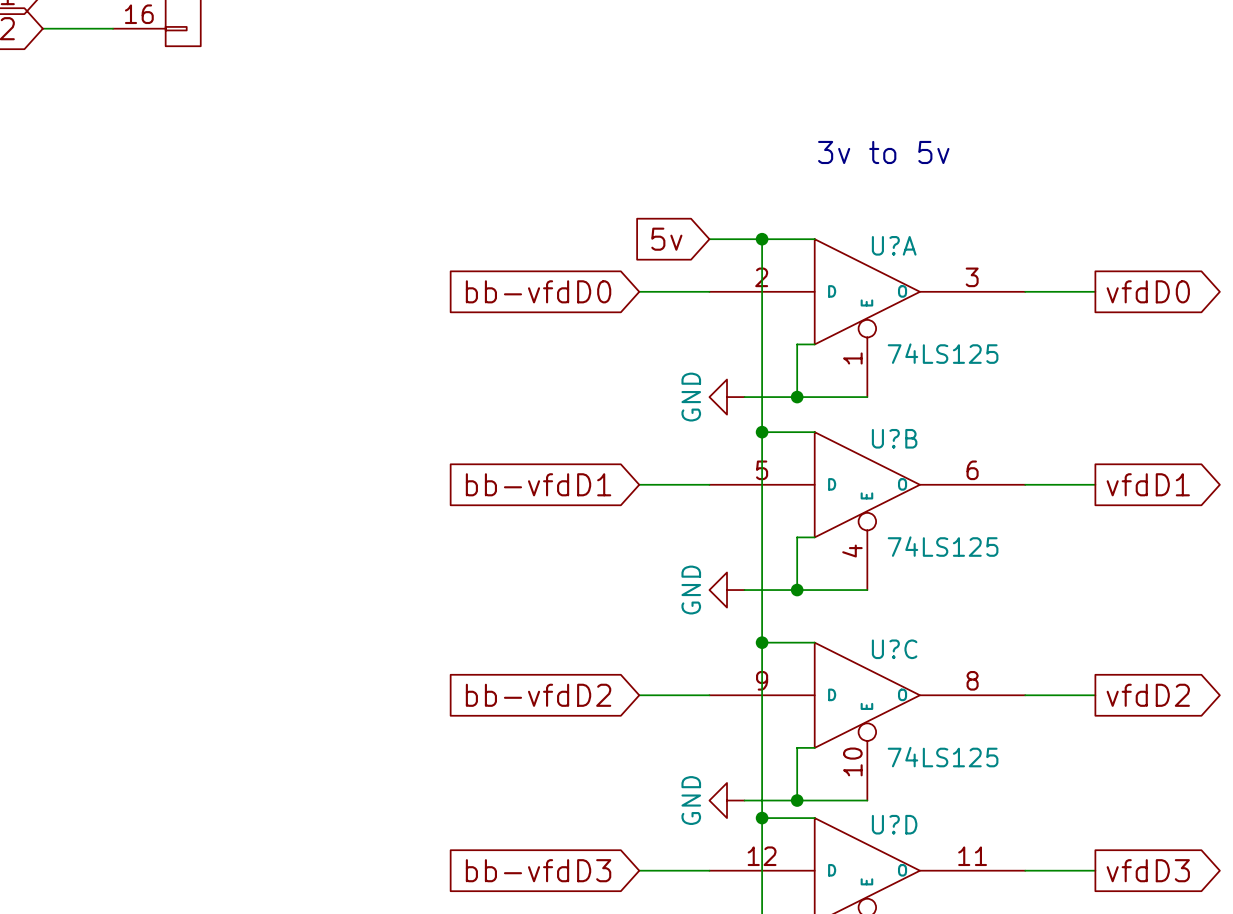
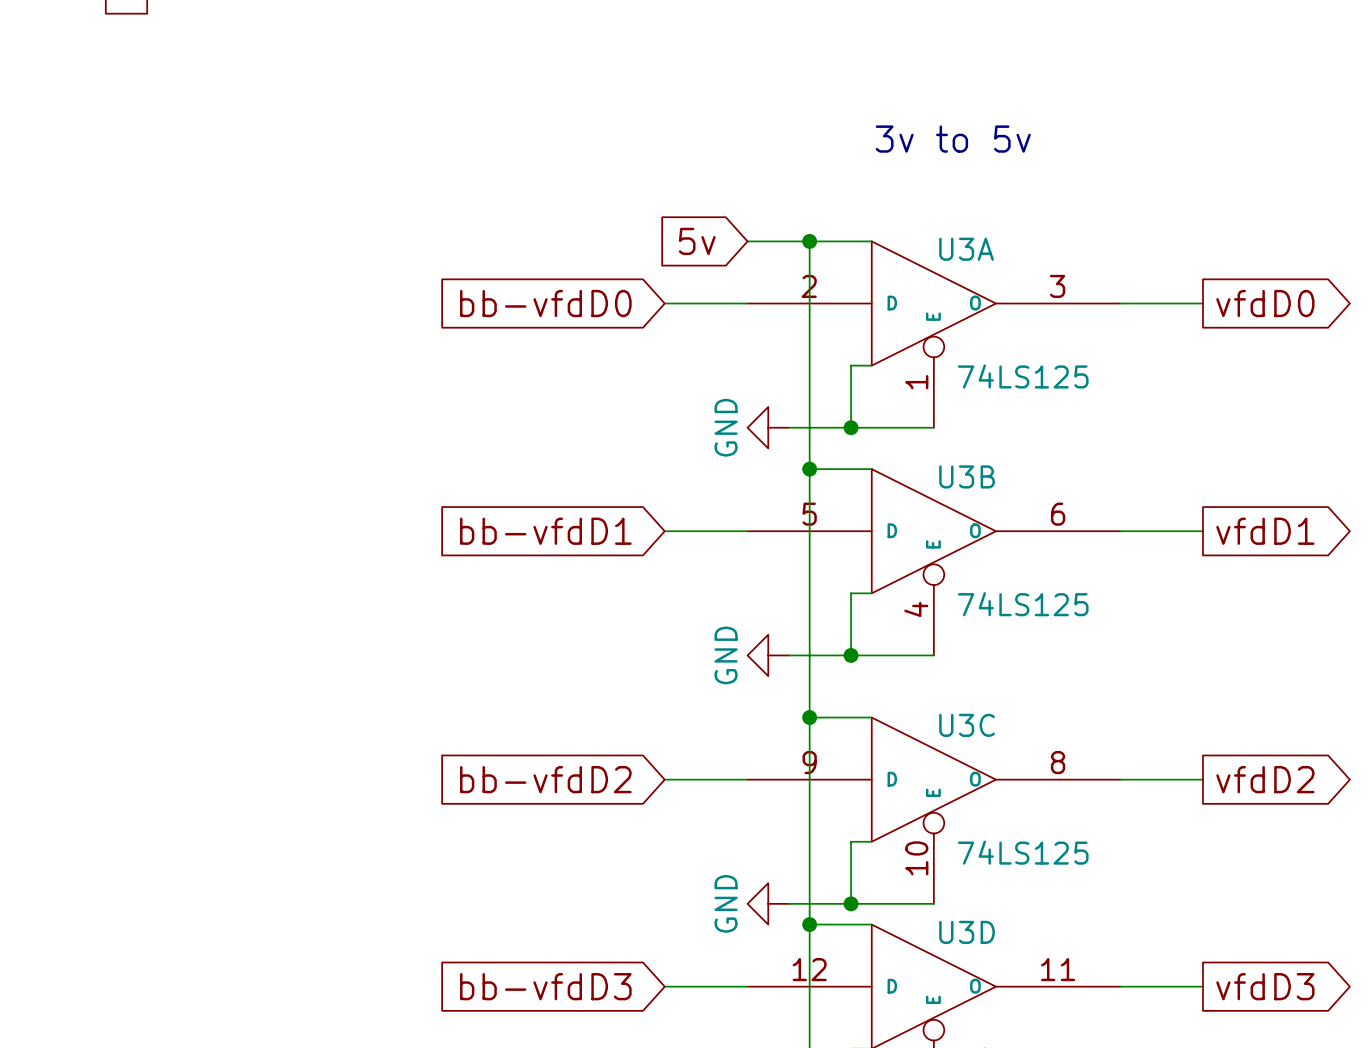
U?A name: U?A (894, 245) -> U3A (966, 249)
U?B name: U?B (894, 438) -> U3B (967, 476)
U?C name: U?C (894, 649) -> U3C (967, 725)
U?D name: U?D (894, 824) -> U3D (967, 932)

